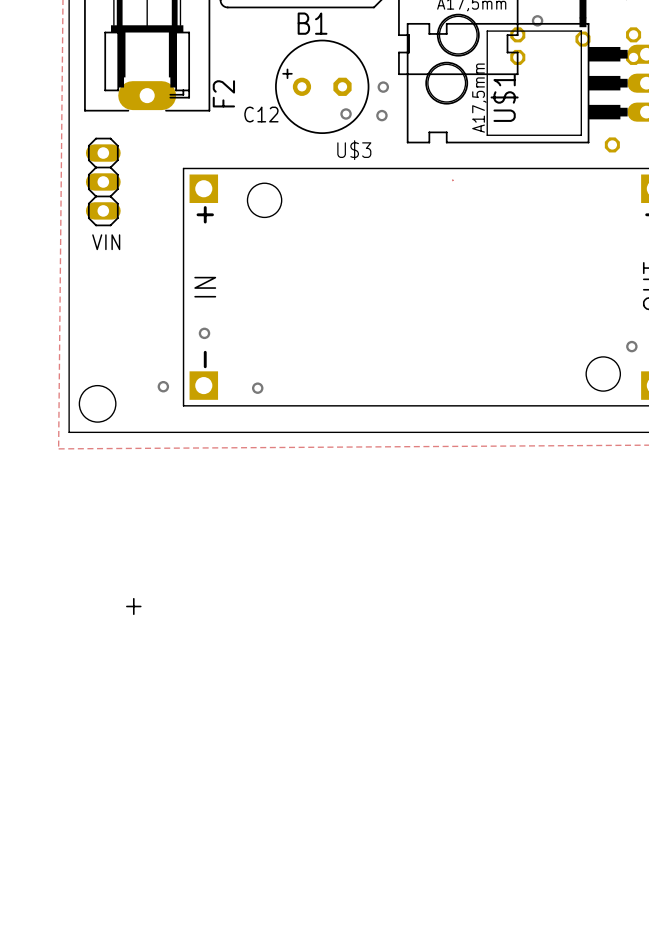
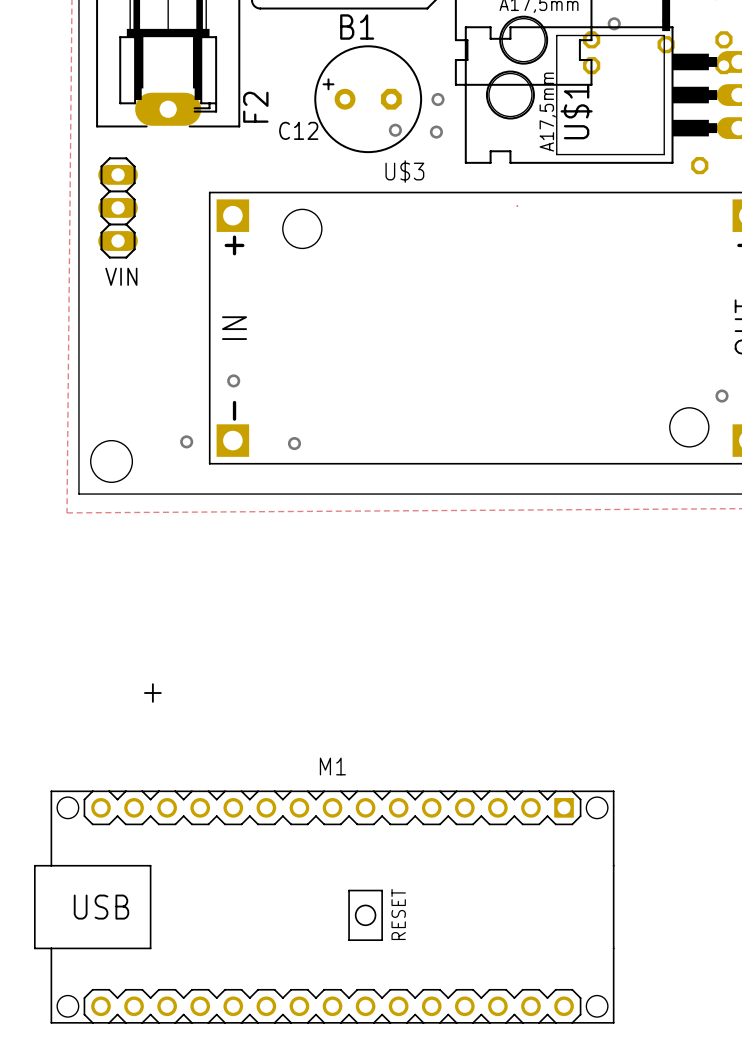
M1: none -> (324, 907)

